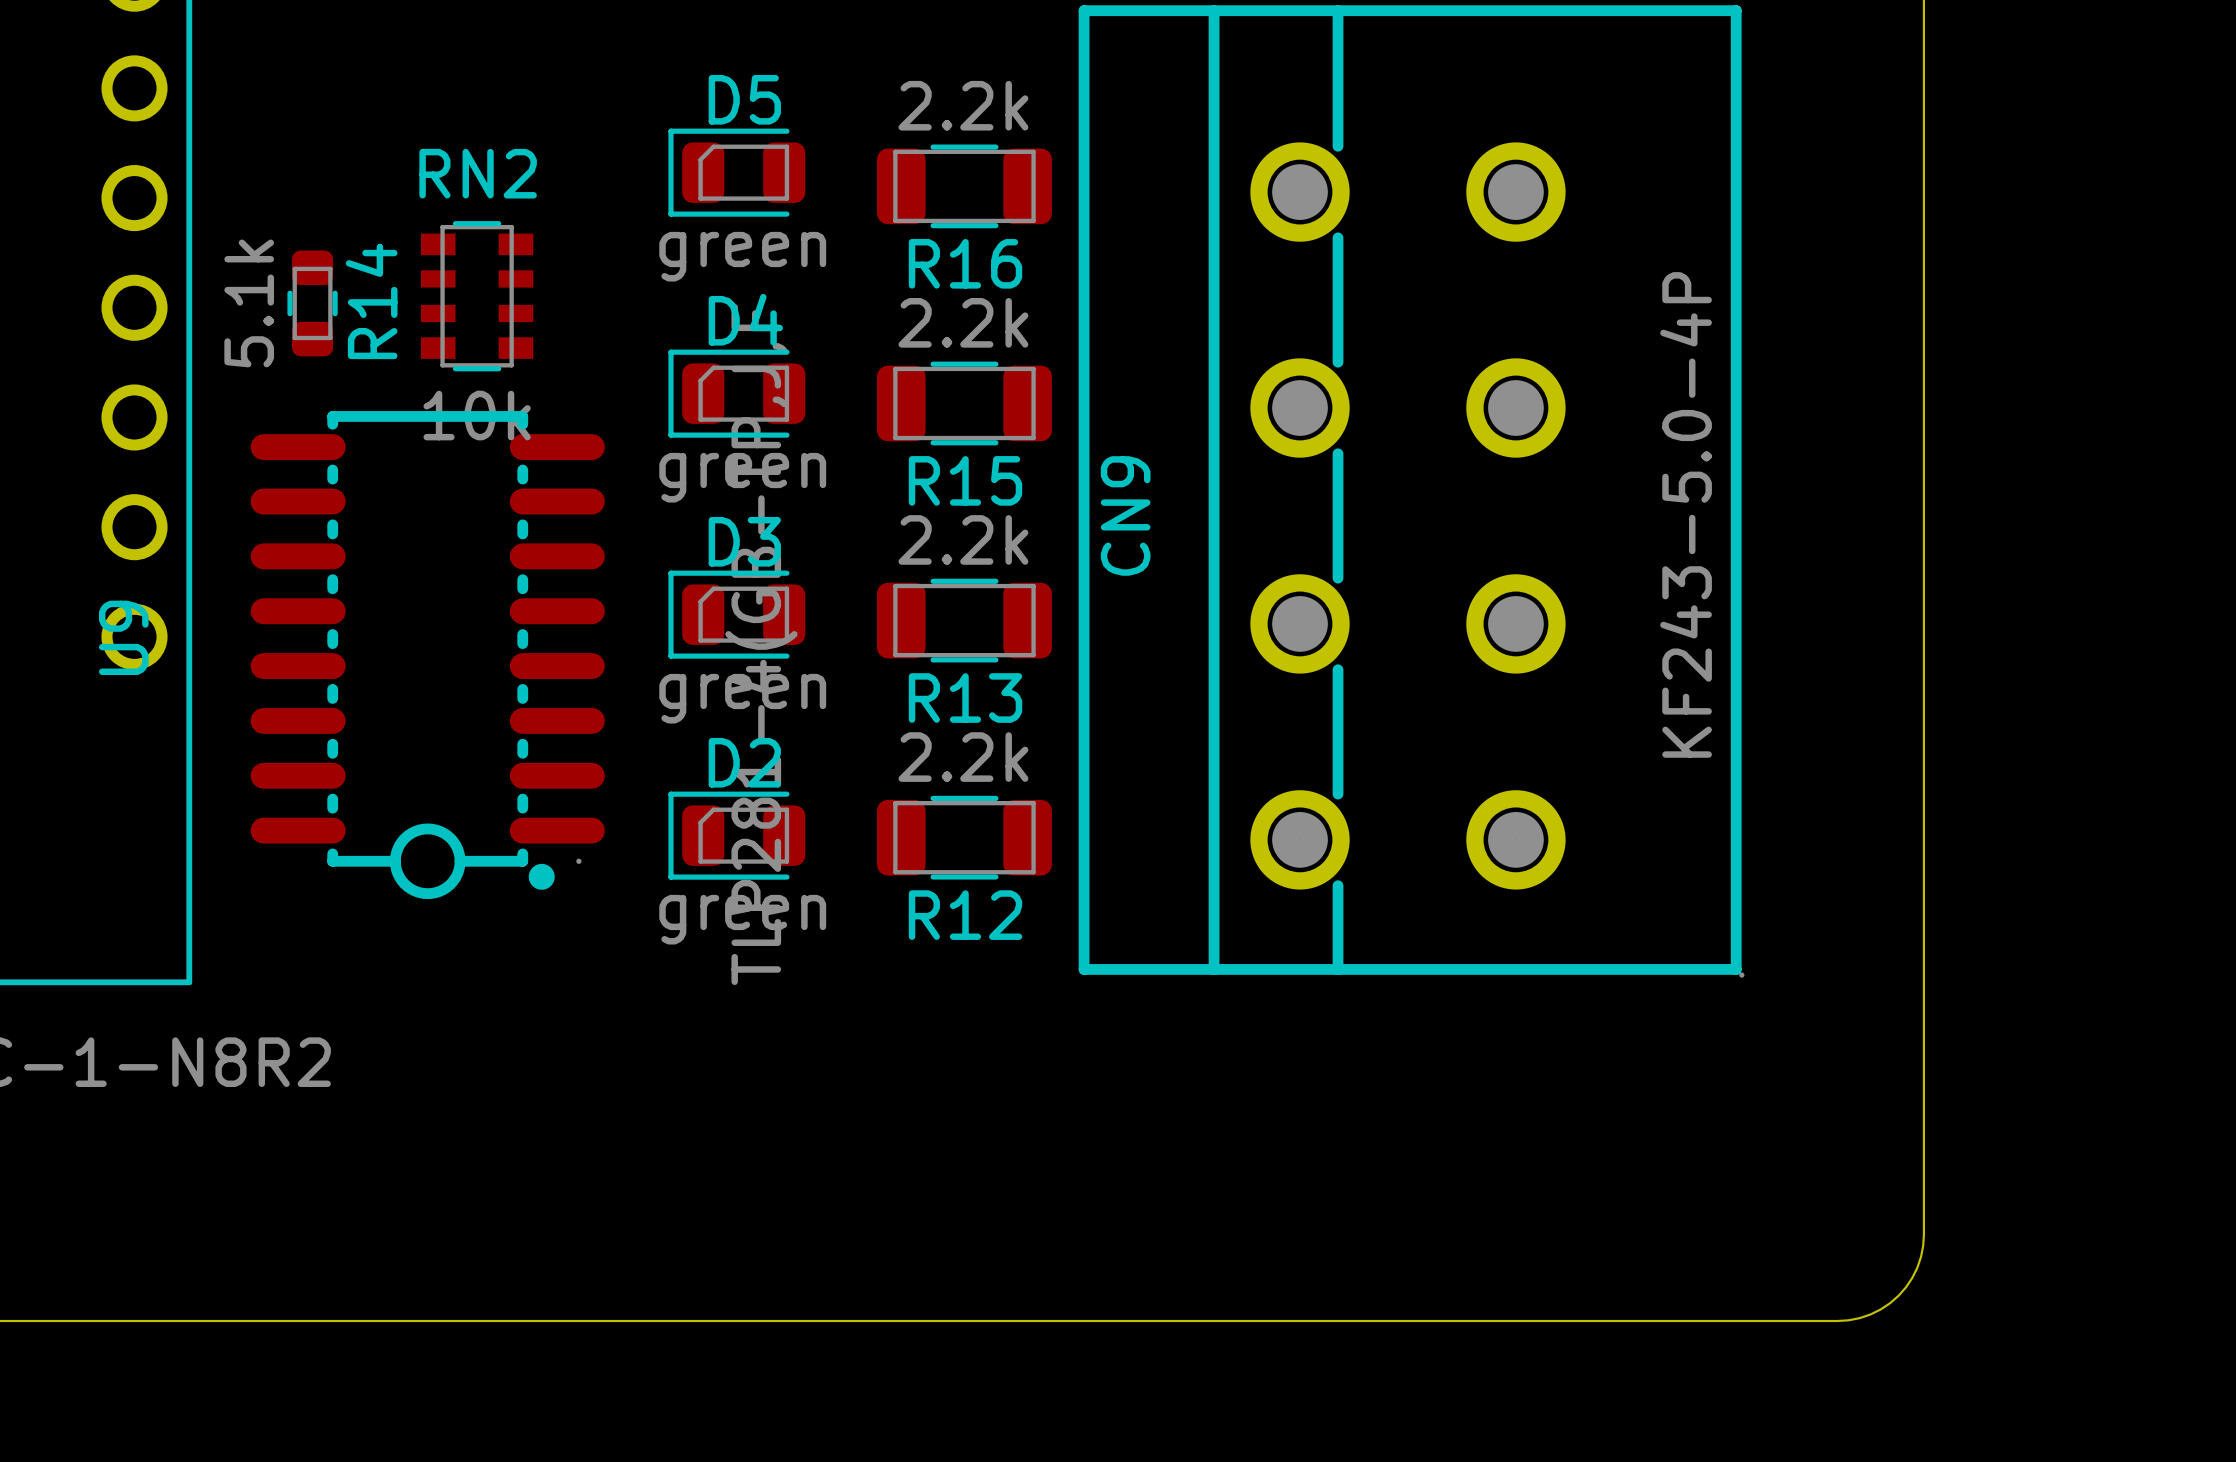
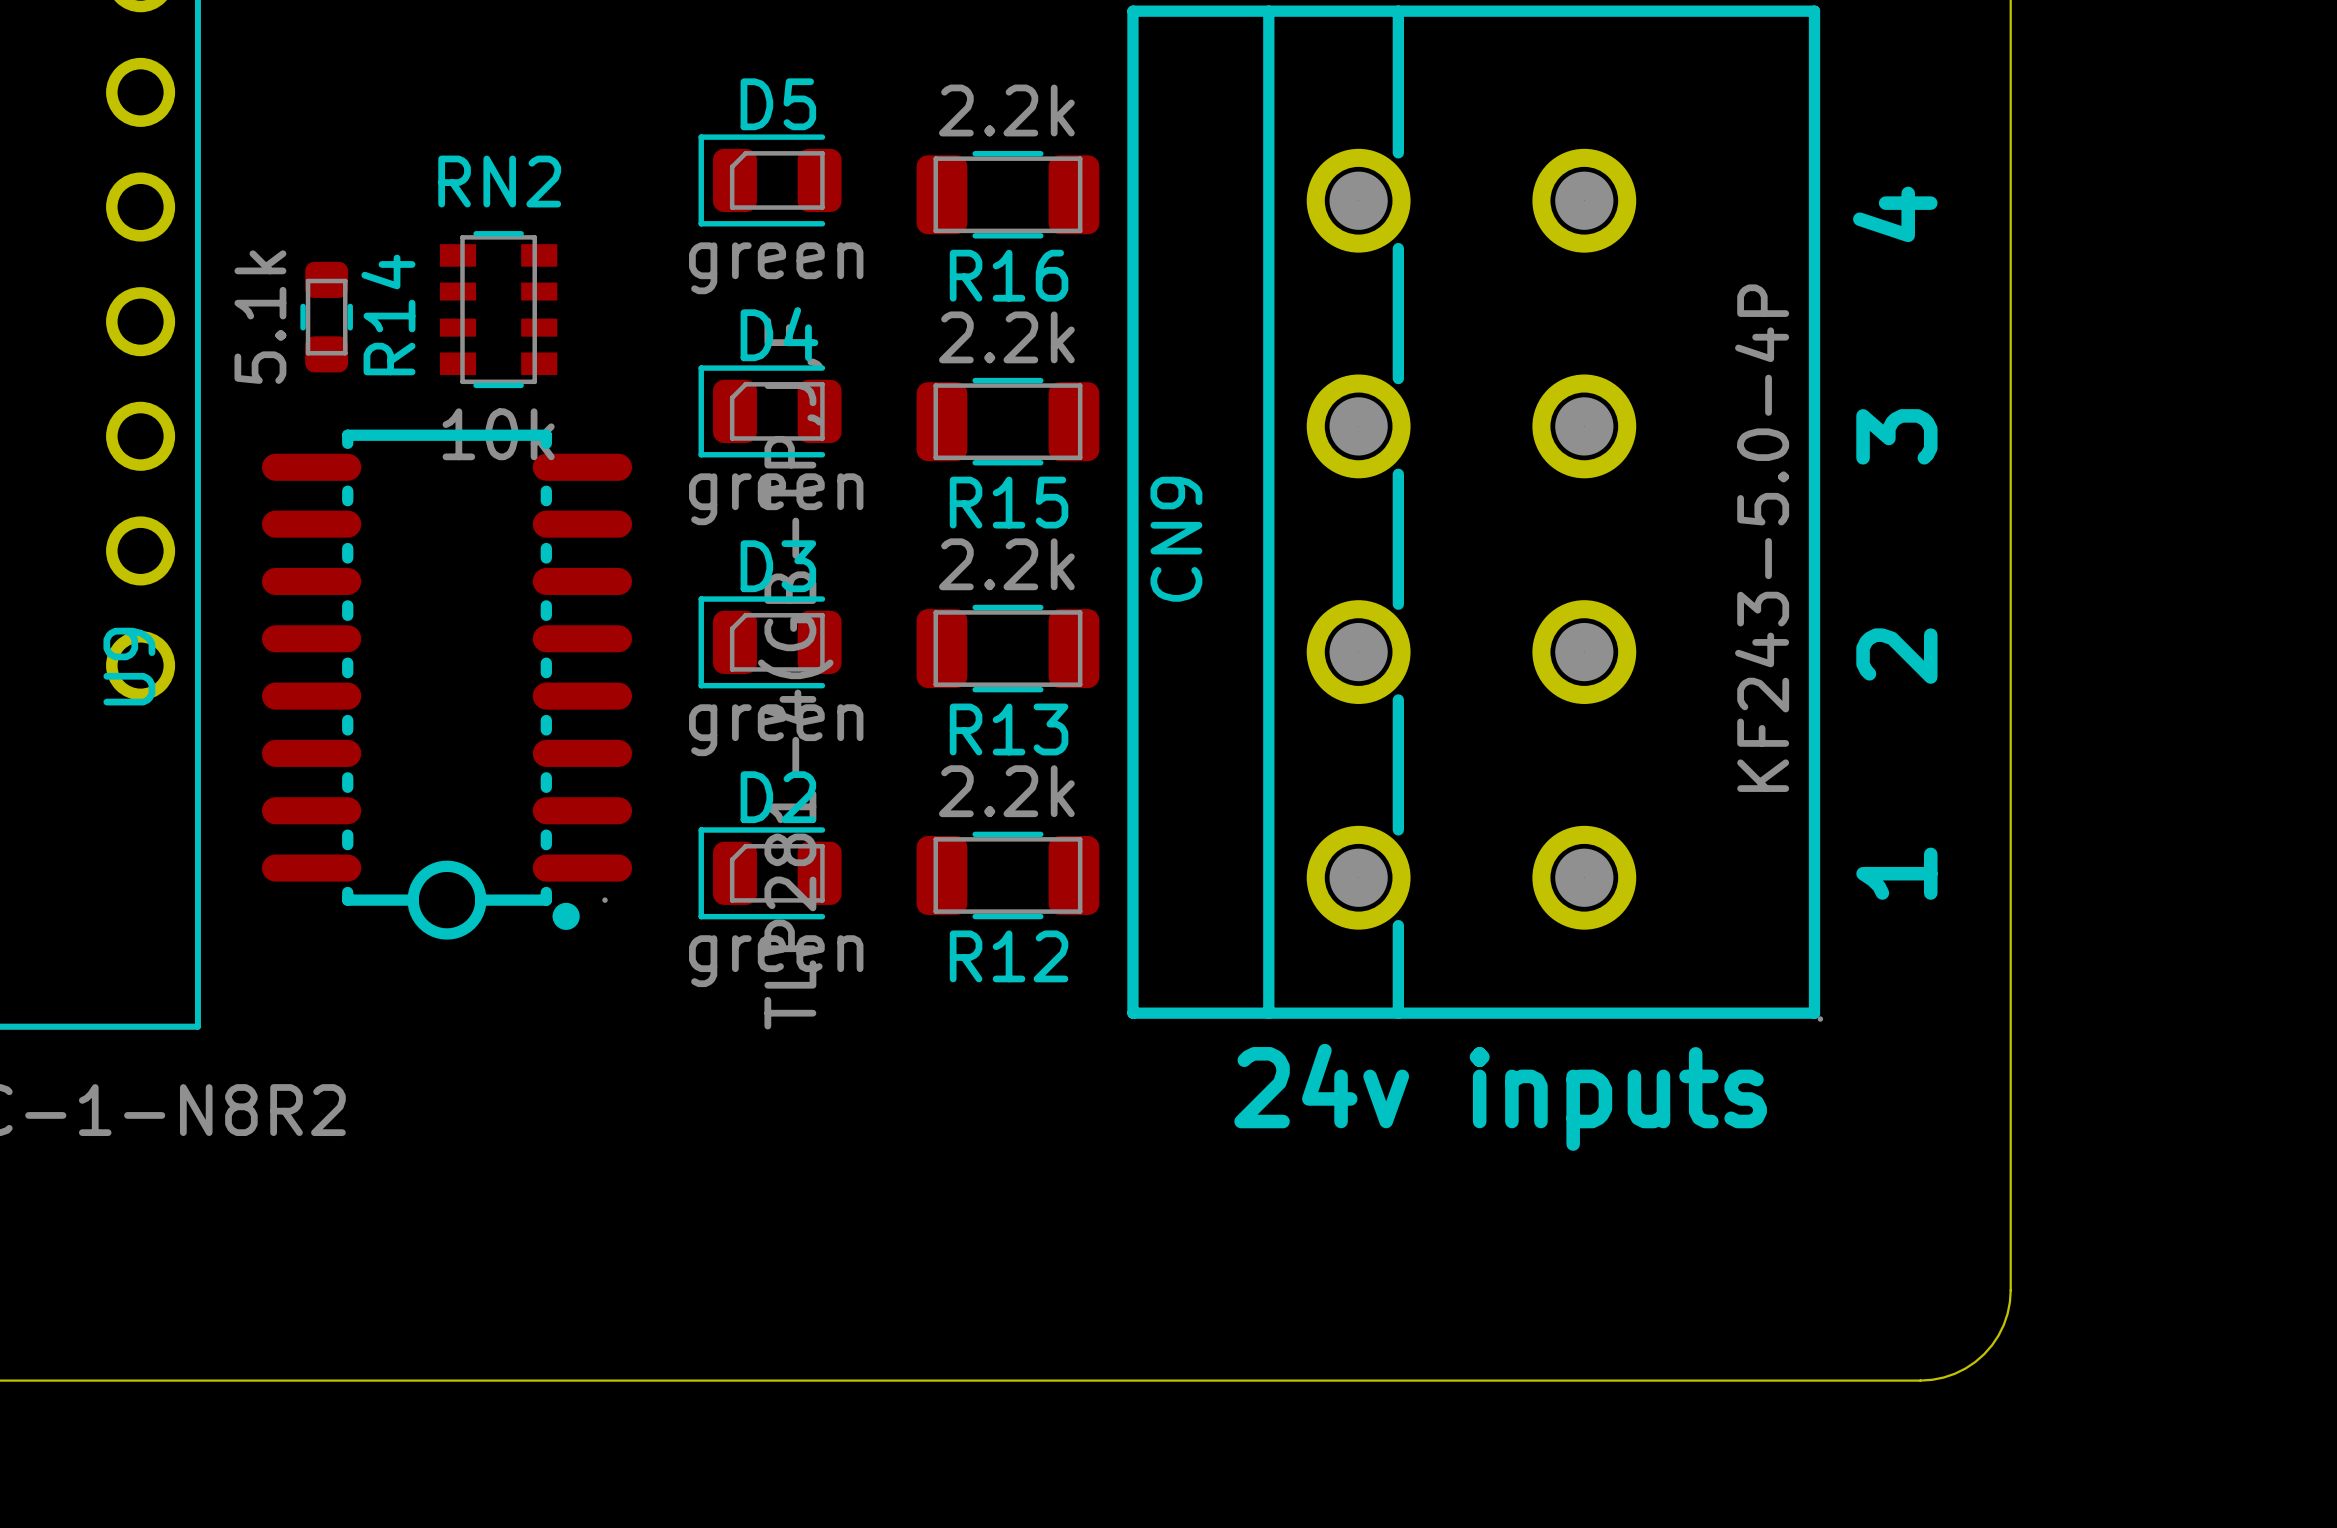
text: none -> 1 2 3 4 (1895, 543)
text: none -> 24v inputs (1500, 1097)

